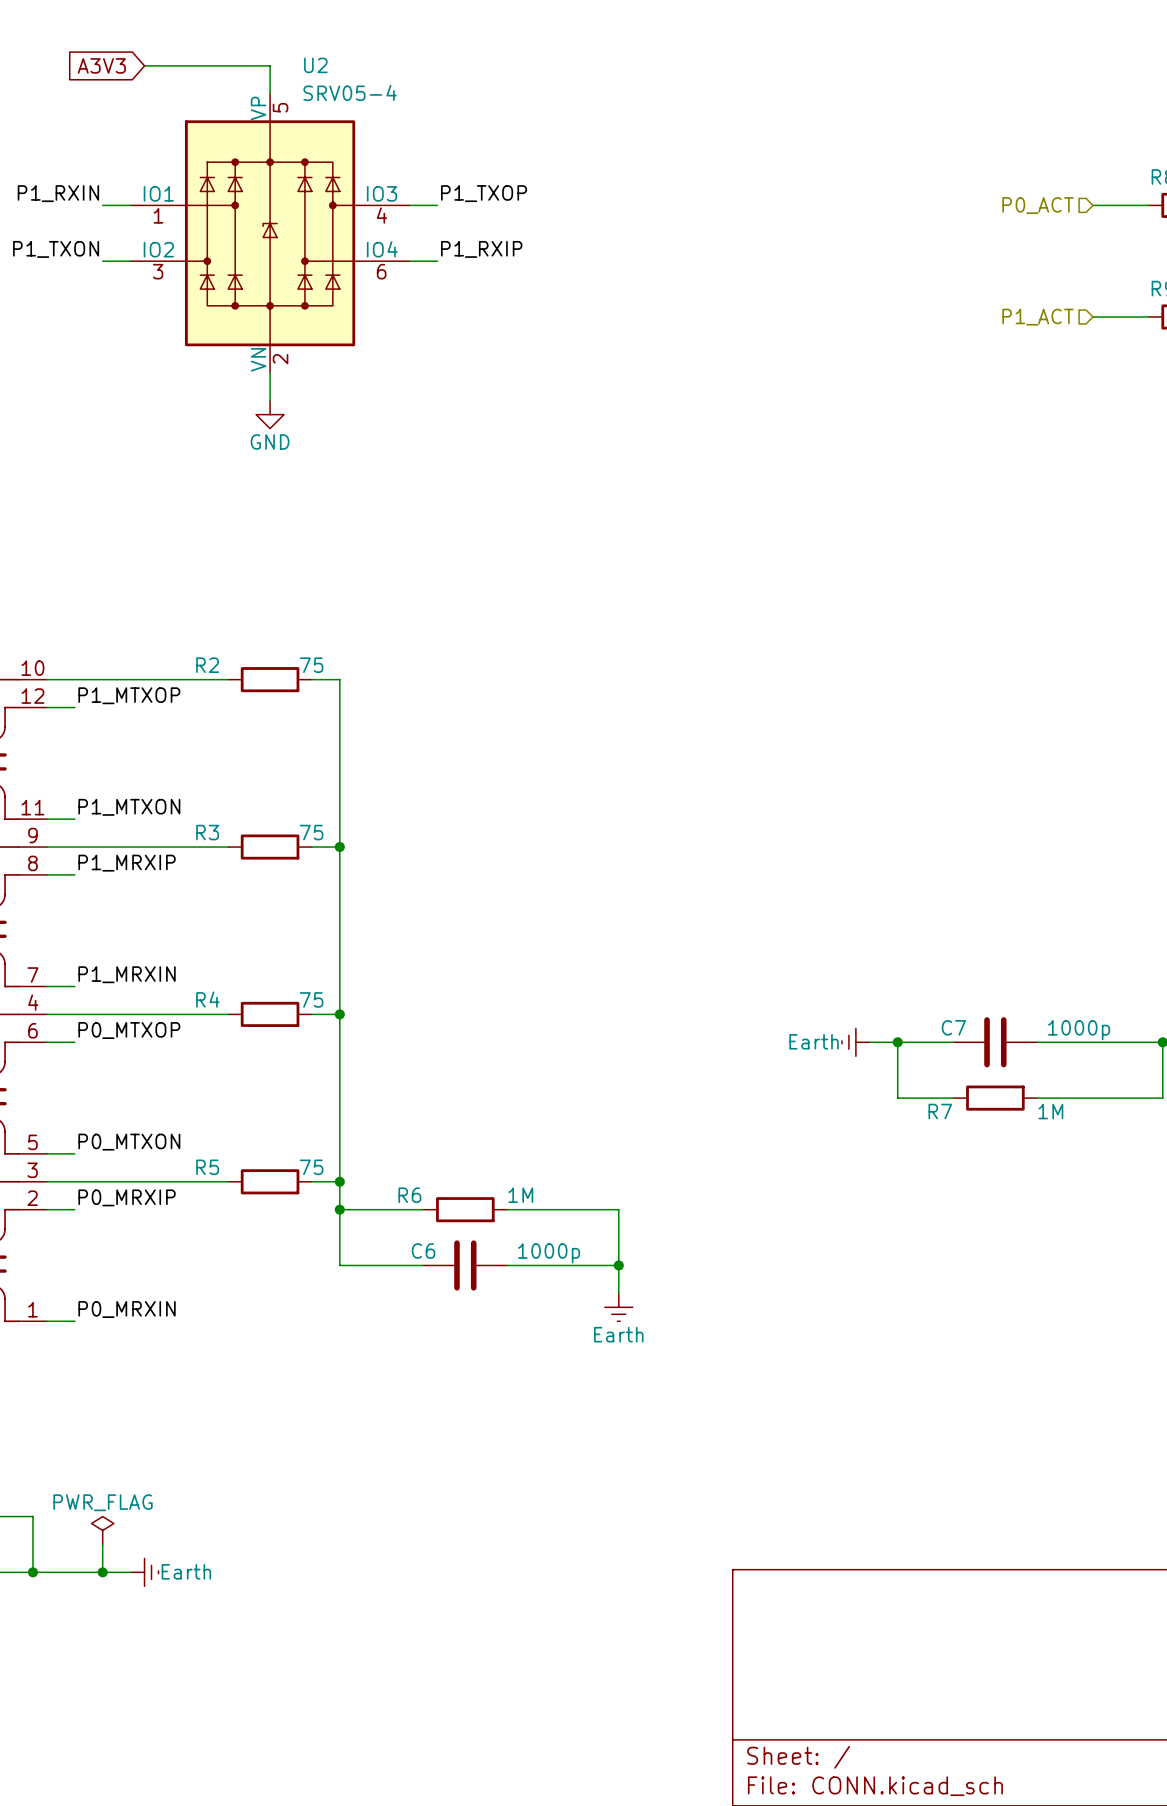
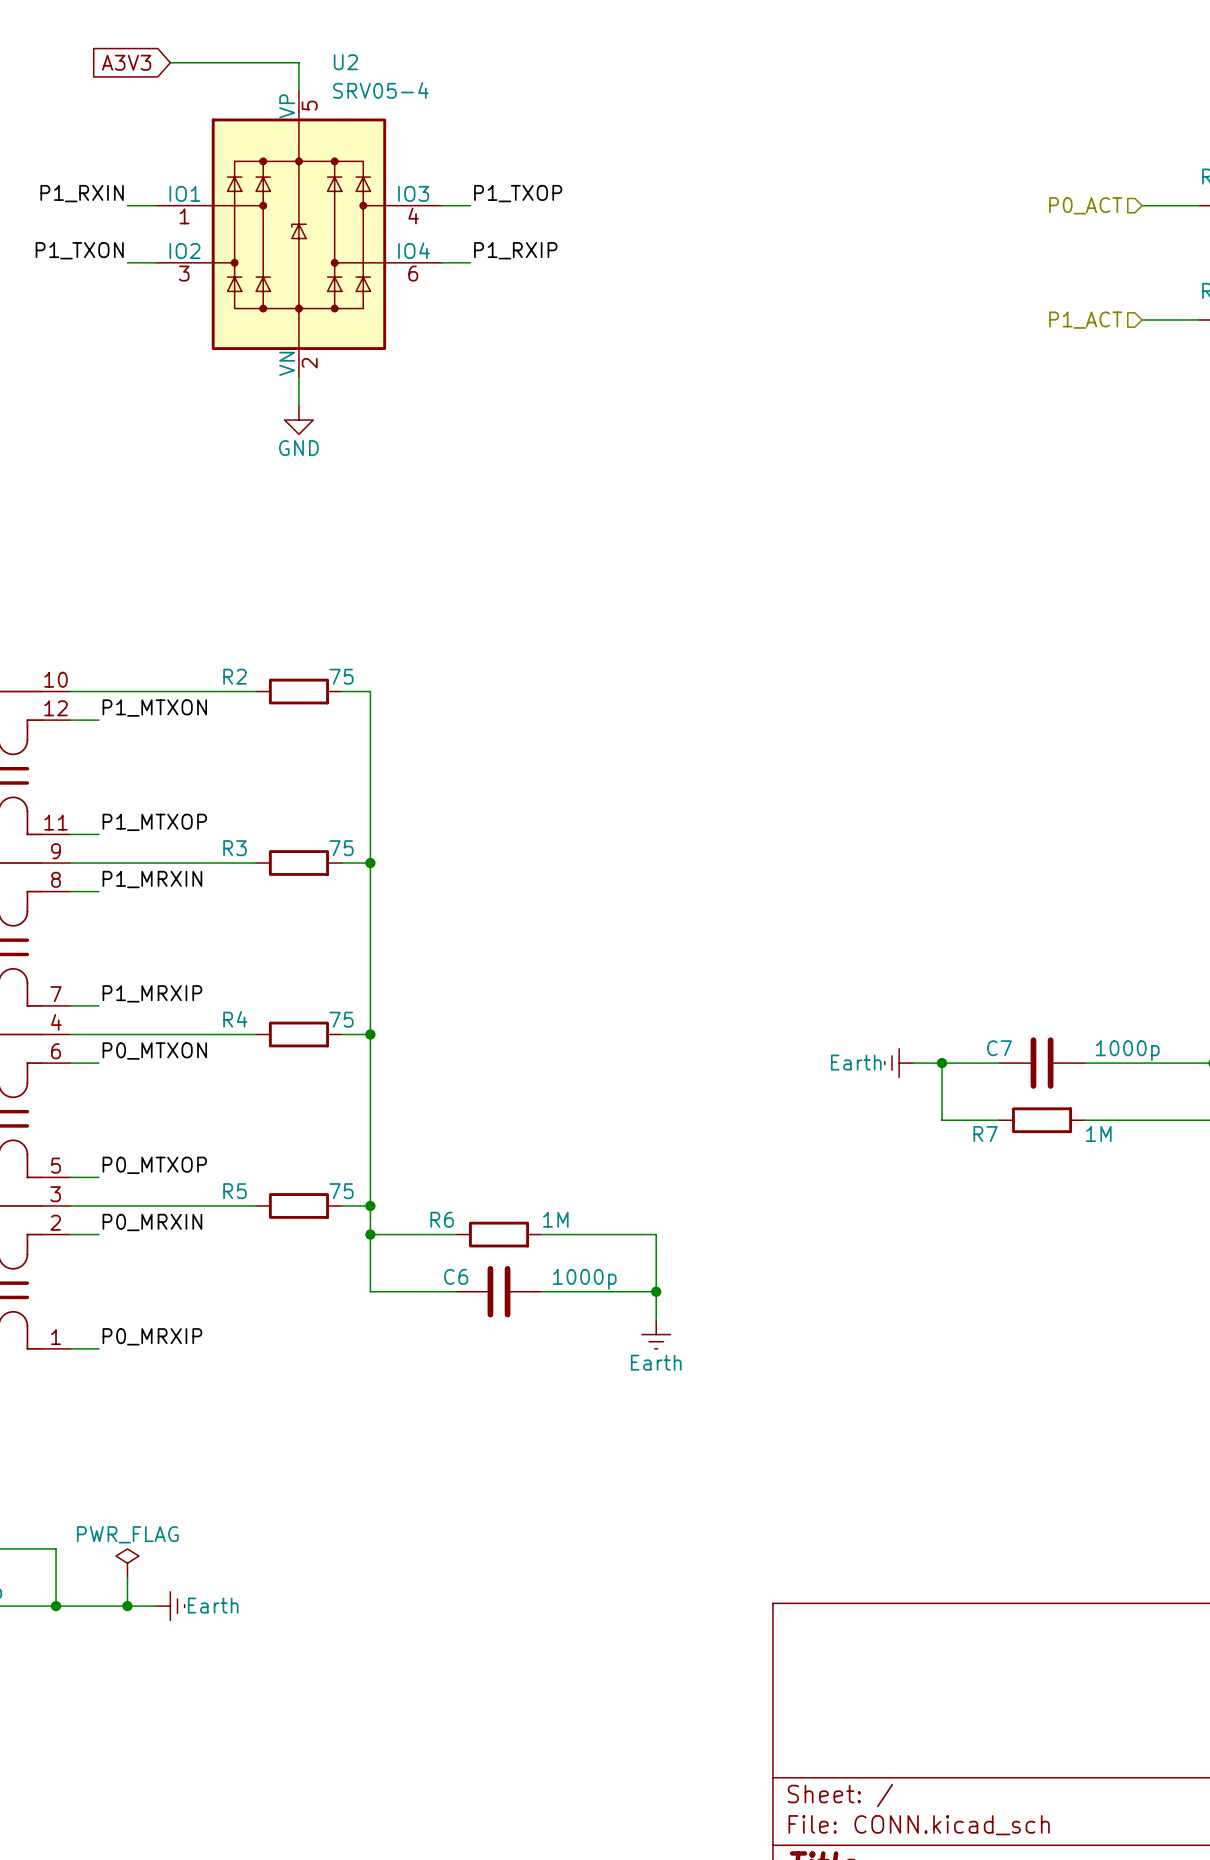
label: P1_MTXOP (129, 695) -> P1_MTXON (154, 708)
label: P1_MTXON (129, 807) -> P1_MTXOP (154, 822)
label: P1_MRXIP (127, 863) -> P1_MRXIN (152, 879)
label: P1_MRXIN (127, 974) -> P1_MRXIP (152, 993)
label: P0_MTXOP (129, 1030) -> P0_MTXON (154, 1051)
label: P0_MTXON (129, 1142) -> P0_MTXOP (154, 1165)
label: P0_MRXIP (127, 1197) -> P0_MRXIN (152, 1222)
label: P0_MRXIN (127, 1309) -> P0_MRXIP (152, 1336)

